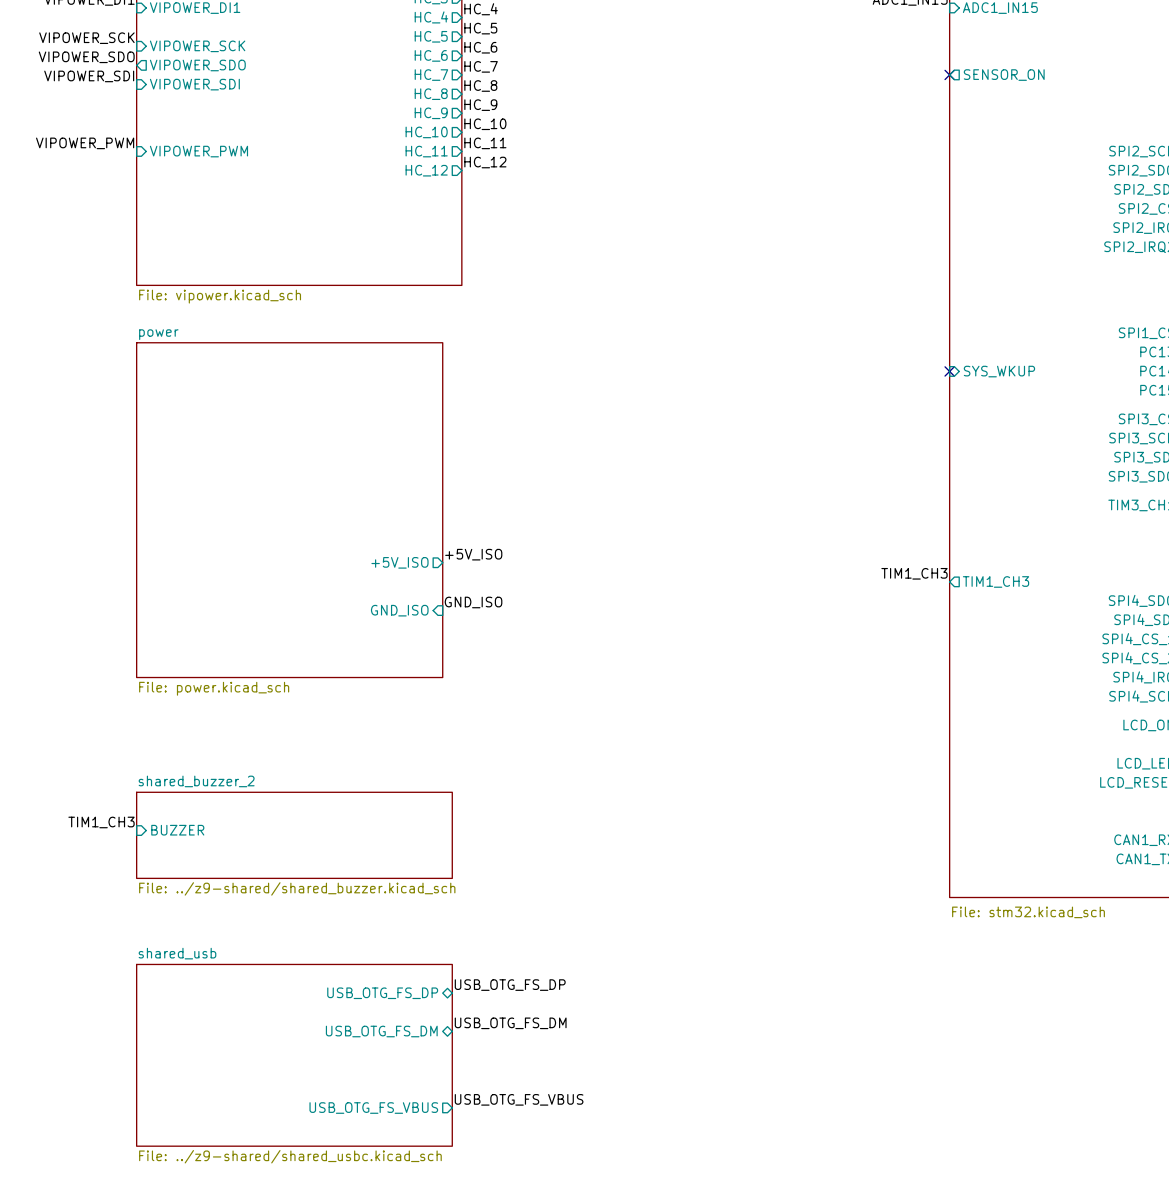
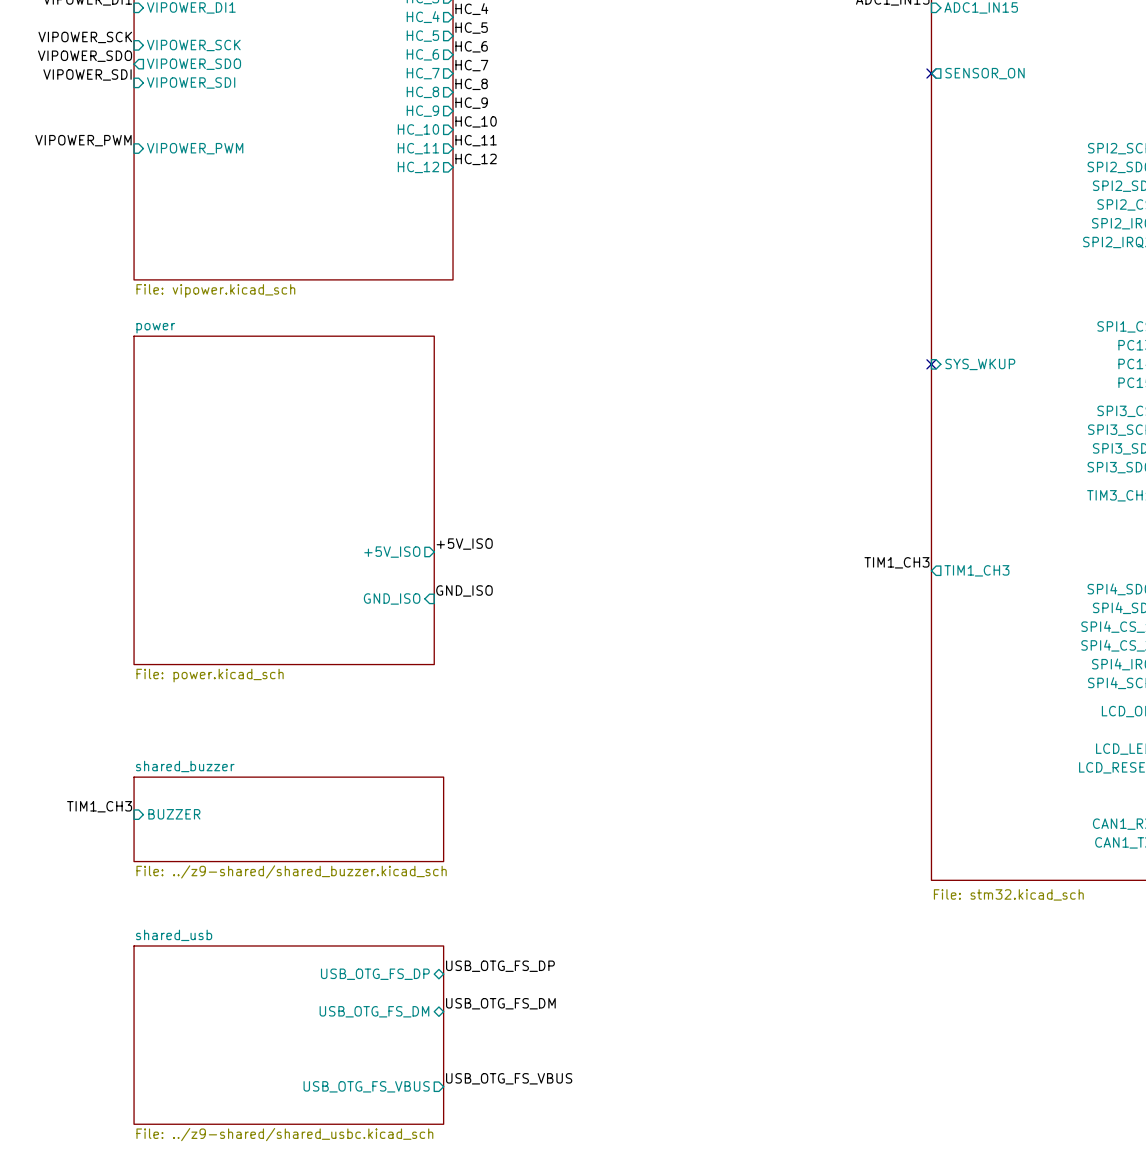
sheet shared_buzzer_2 name: shared_buzzer_2 (196, 781) -> shared_buzzer (185, 766)

